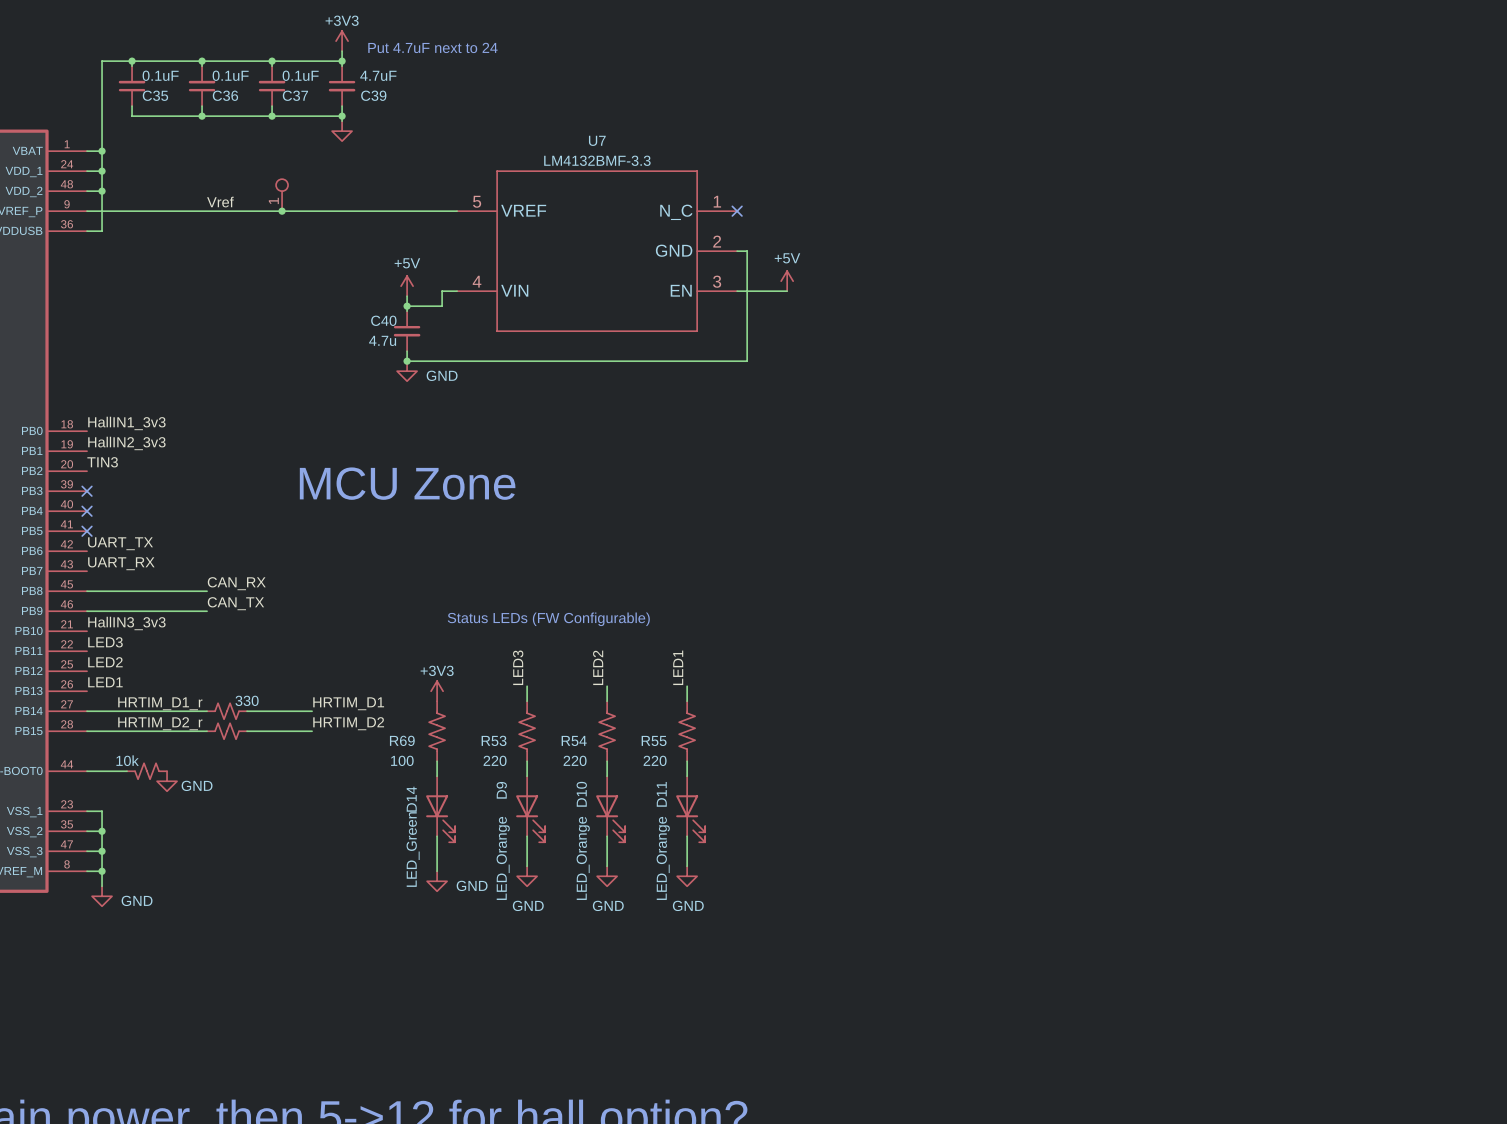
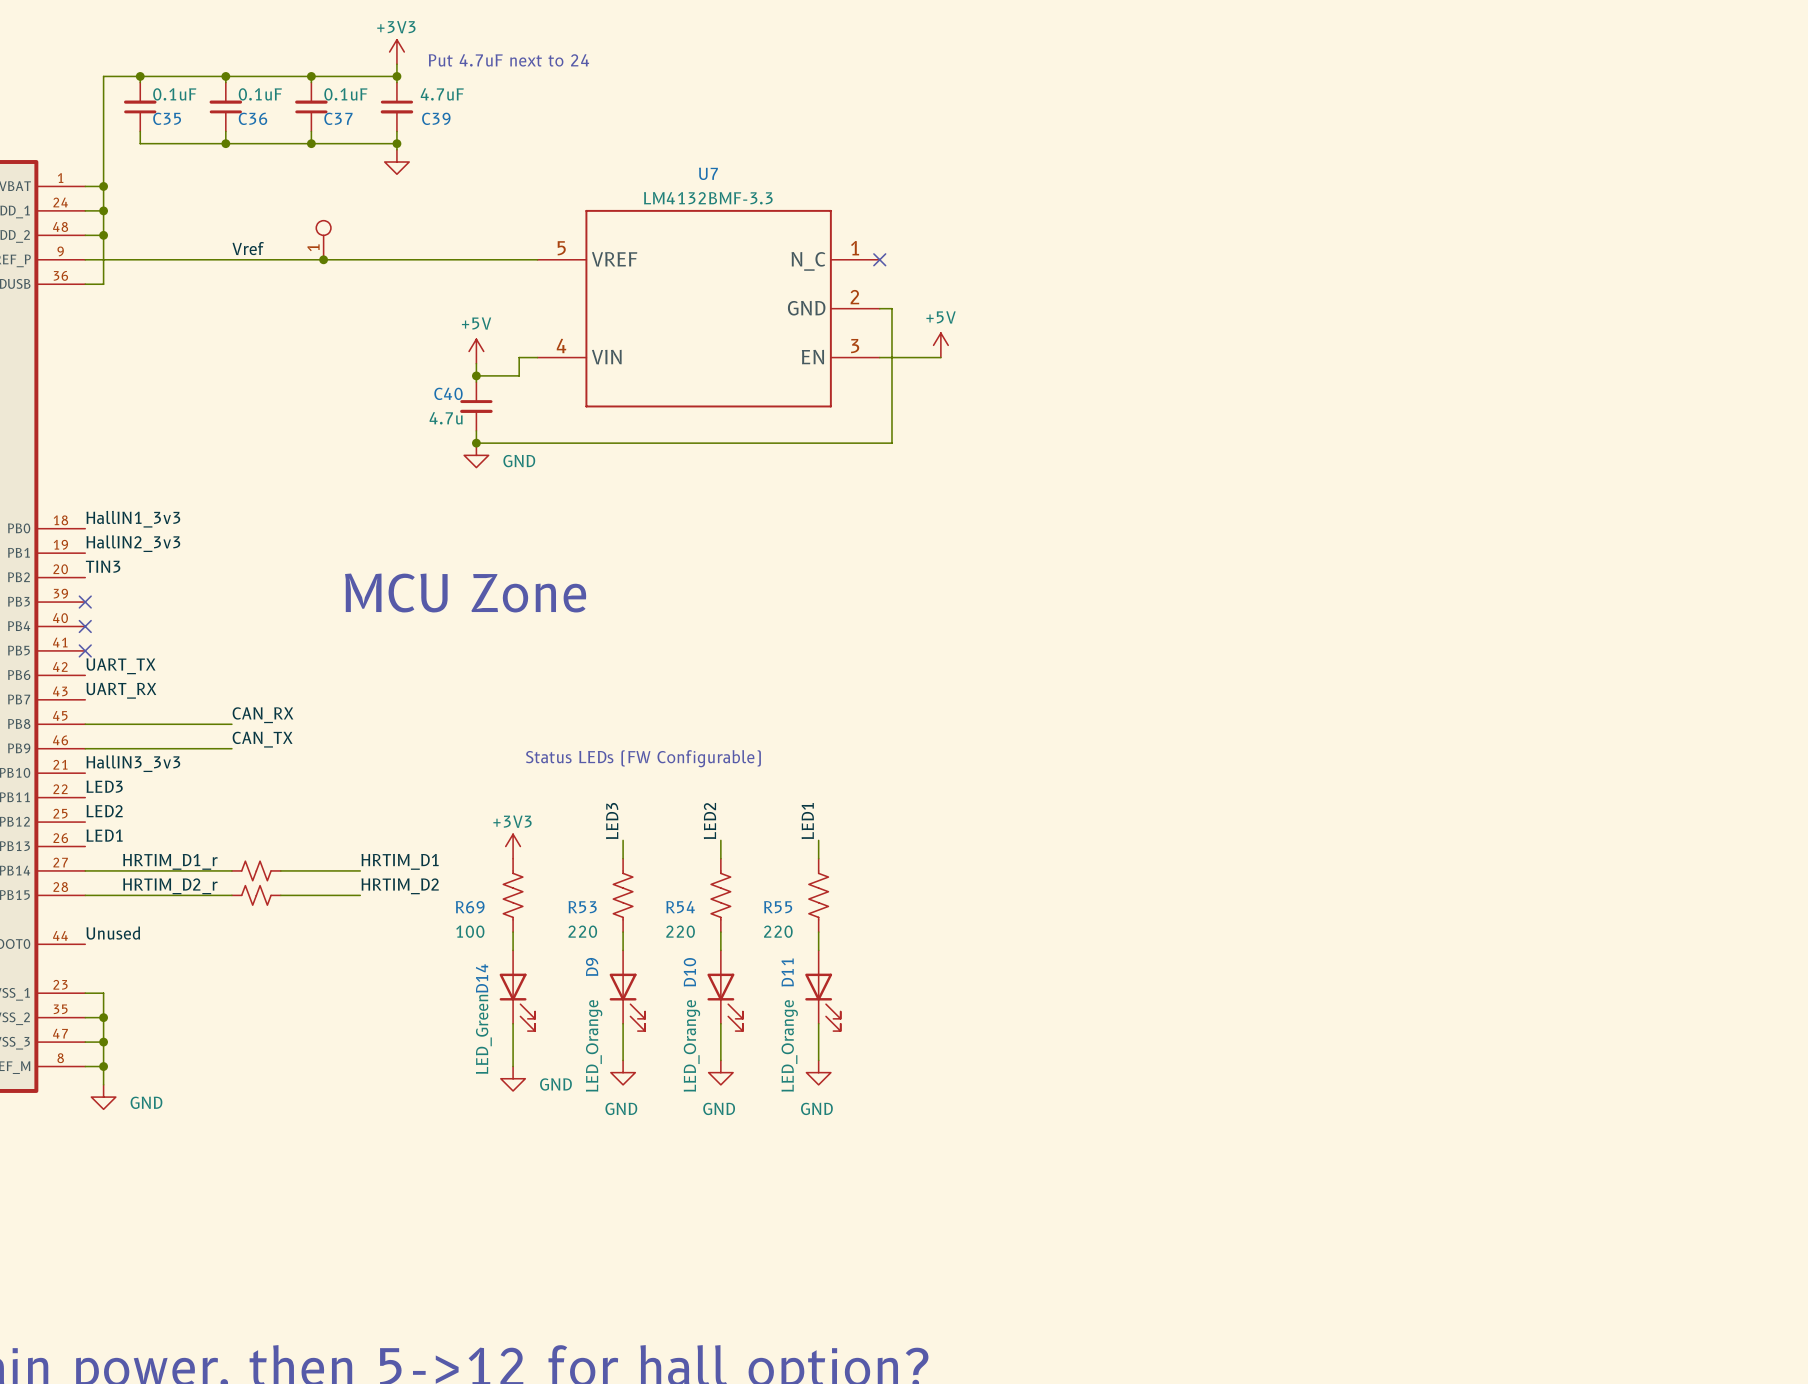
part value: 330 (247, 700) -> none
label: none -> Unused (113, 933)
wire: (87, 771) (127, 771) -> none
part: 10k (147, 771) -> none
power symbol: GND (167, 781) -> none

